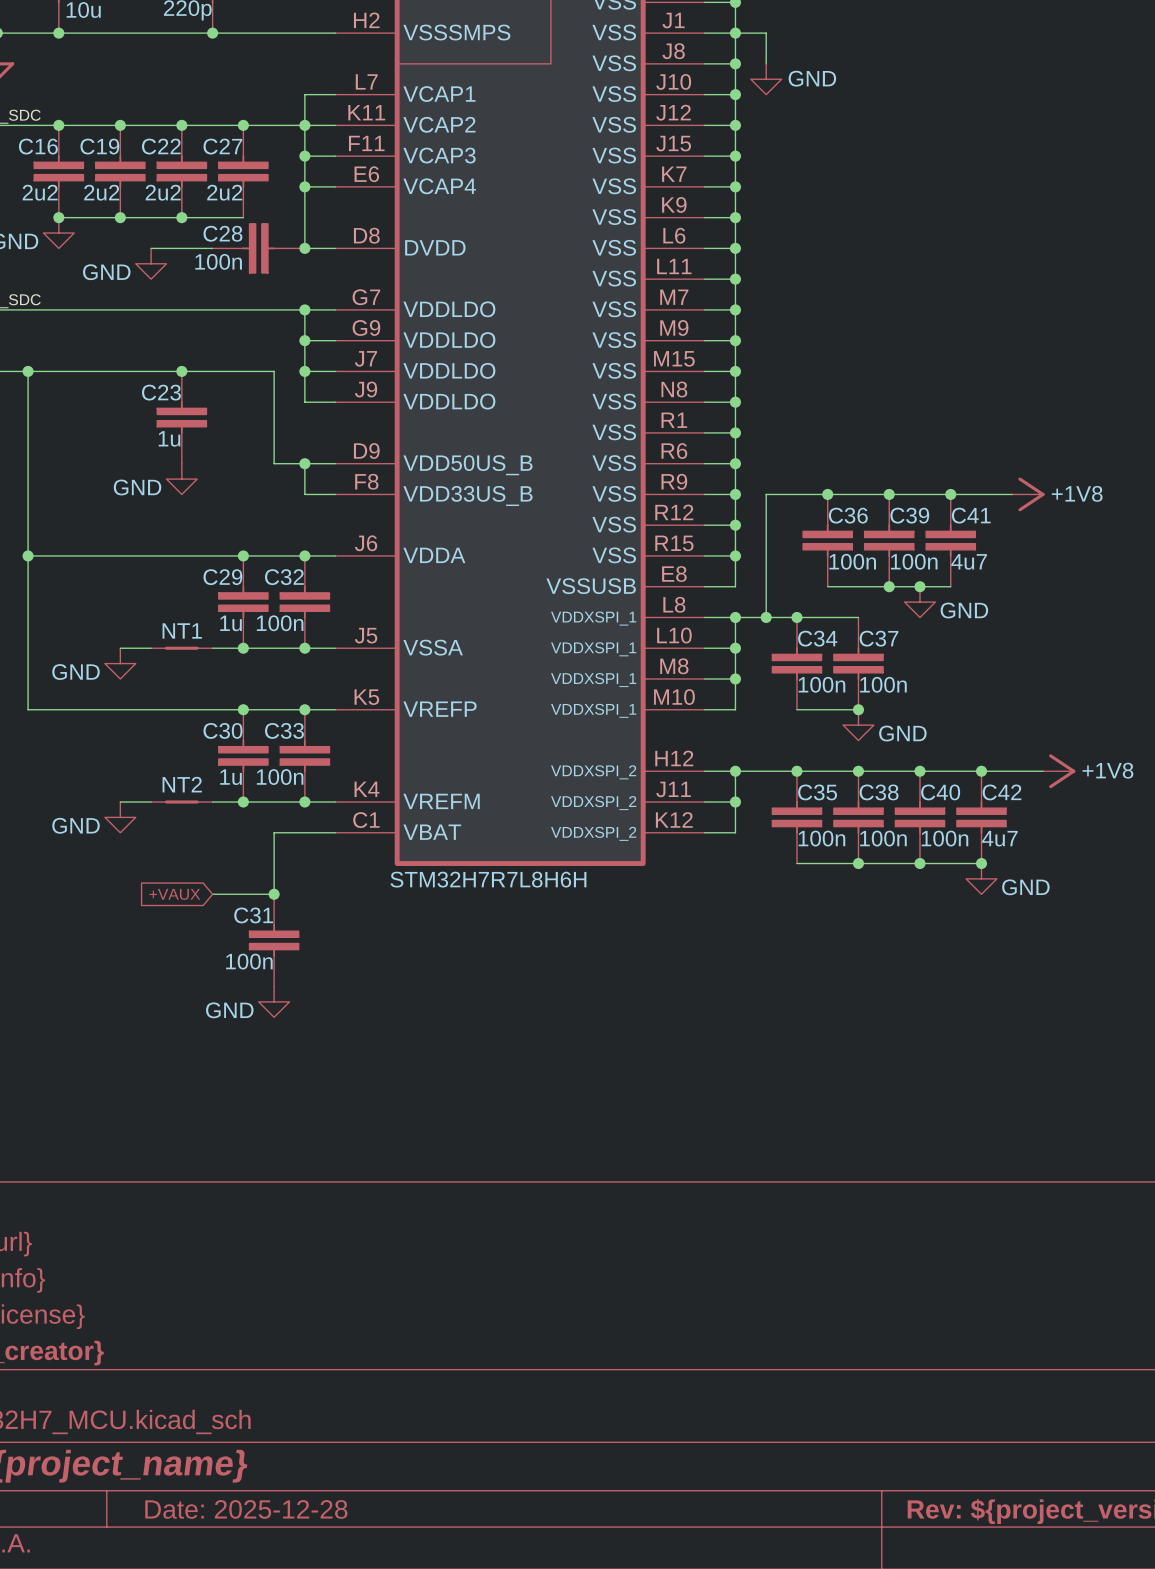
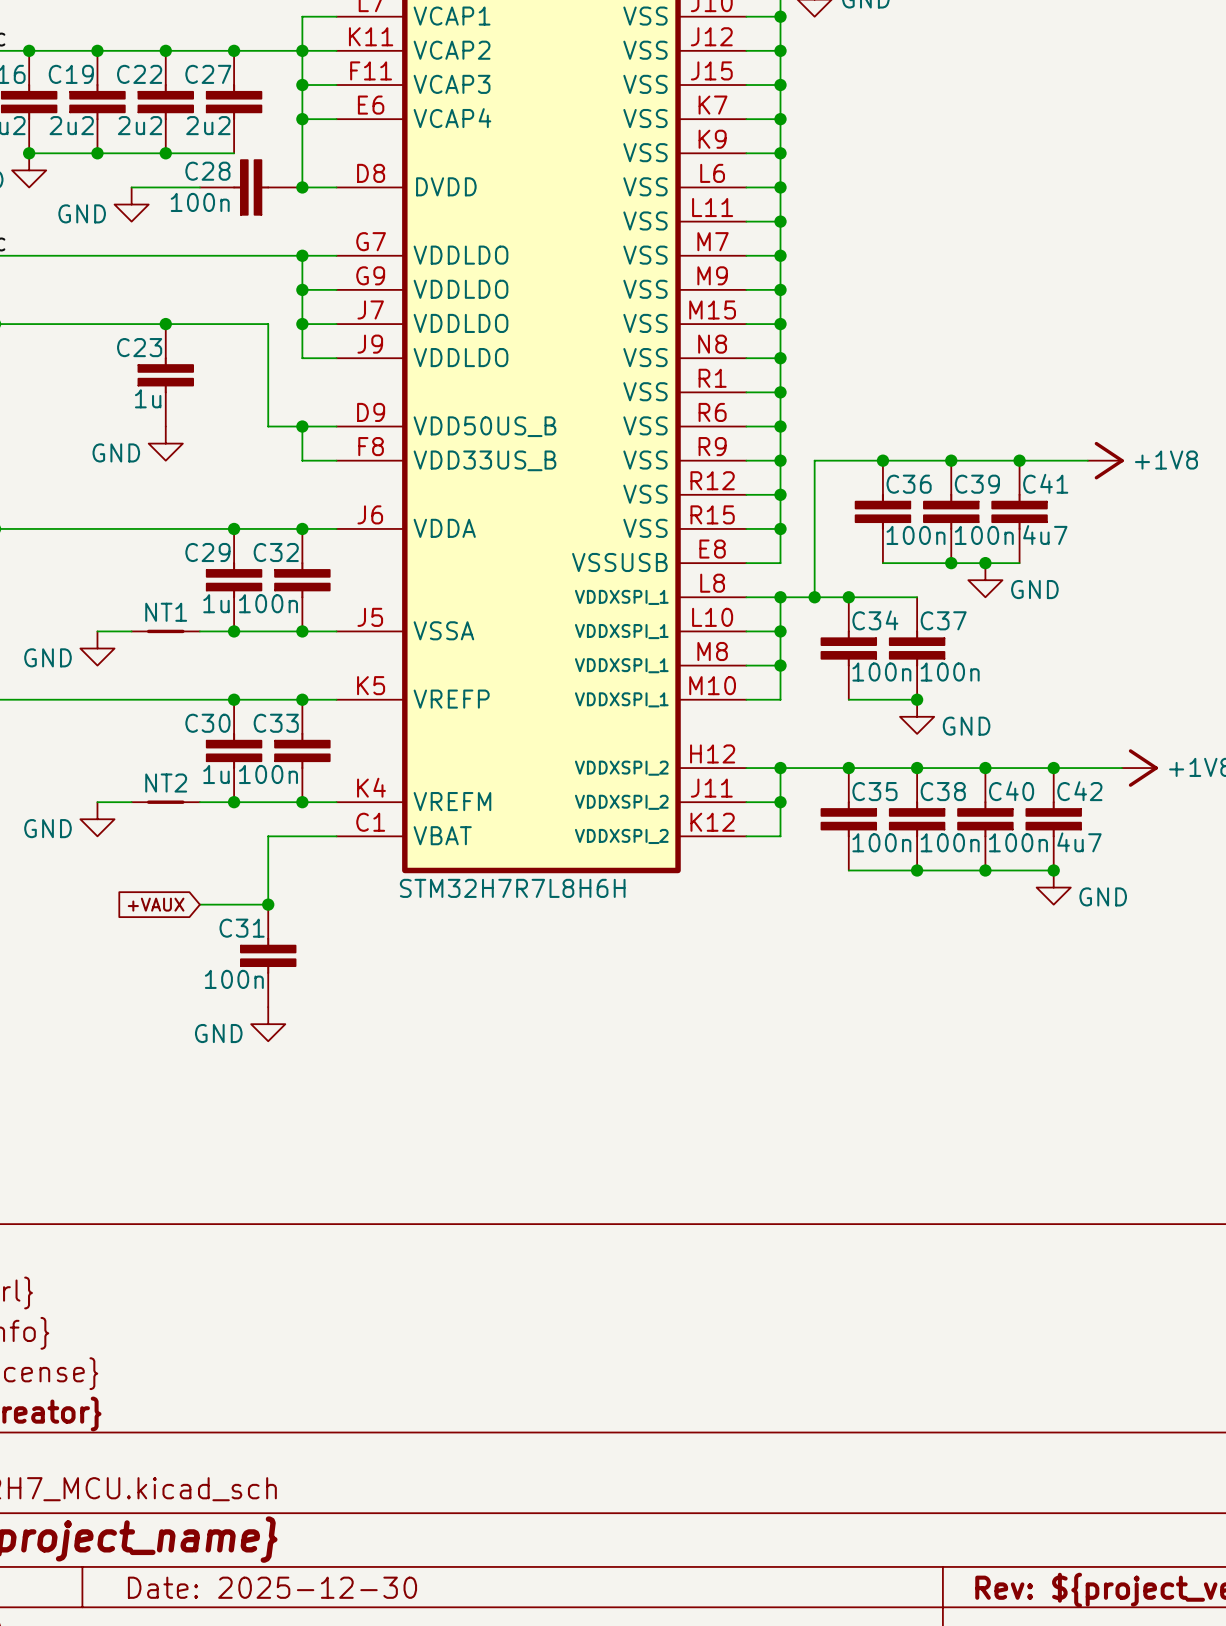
title block: Date: 2025-12-28 (246, 1509) -> Date: 2025-12-30 (272, 1587)

